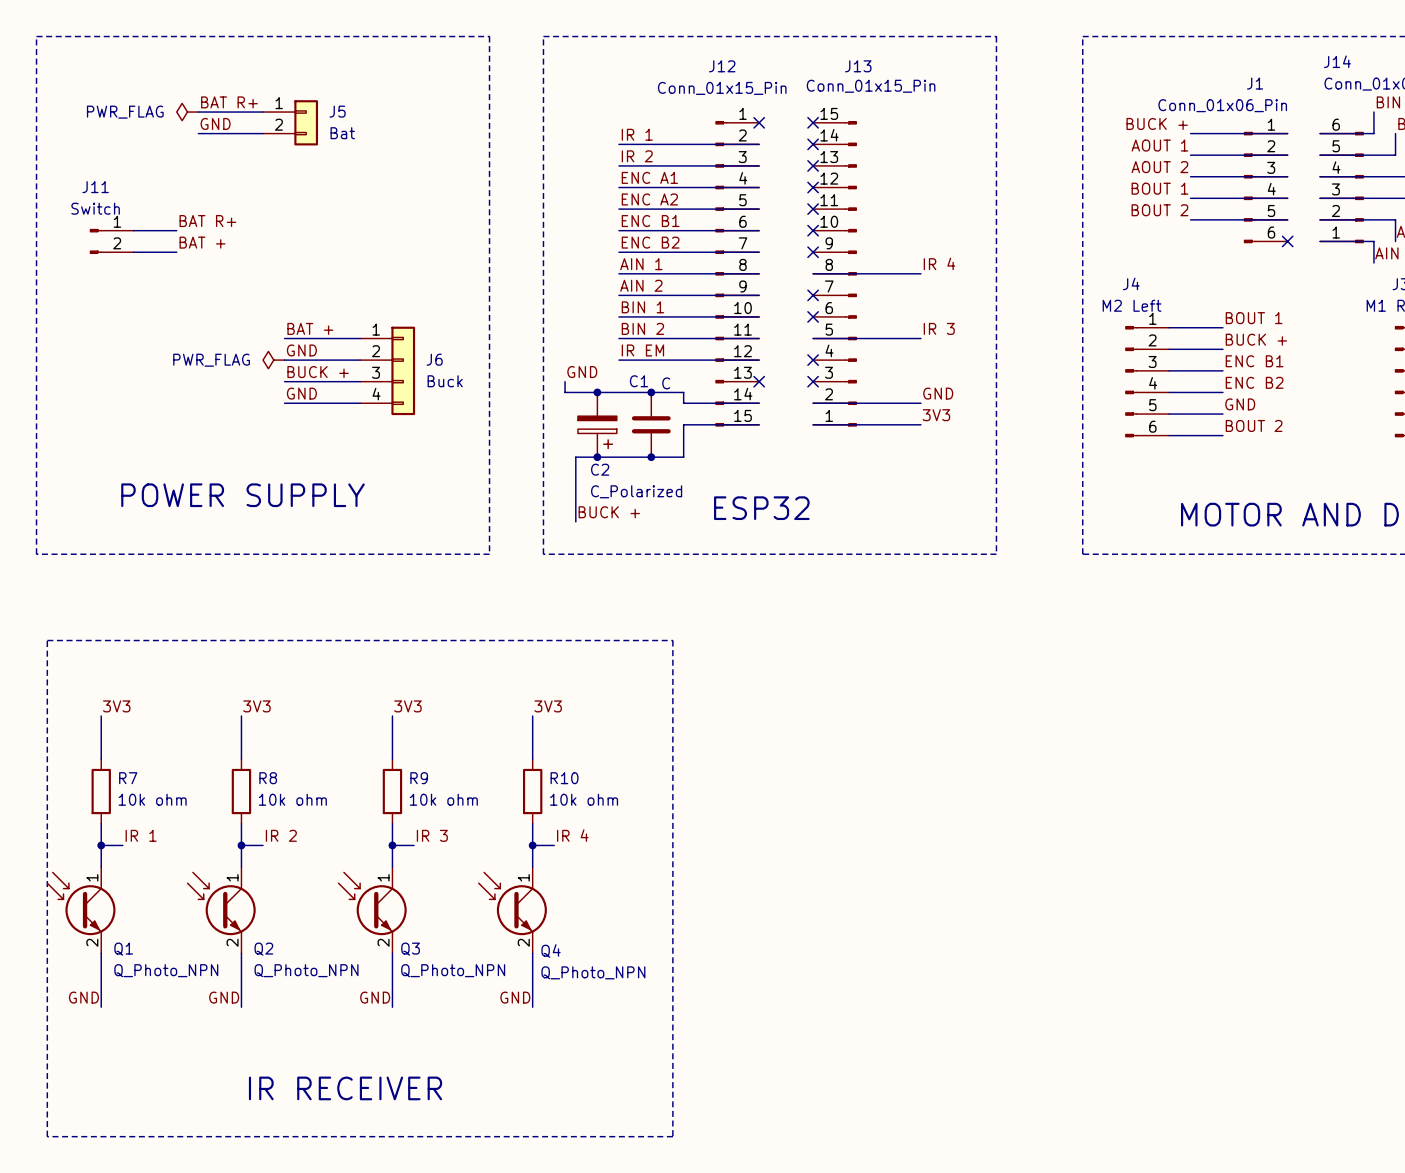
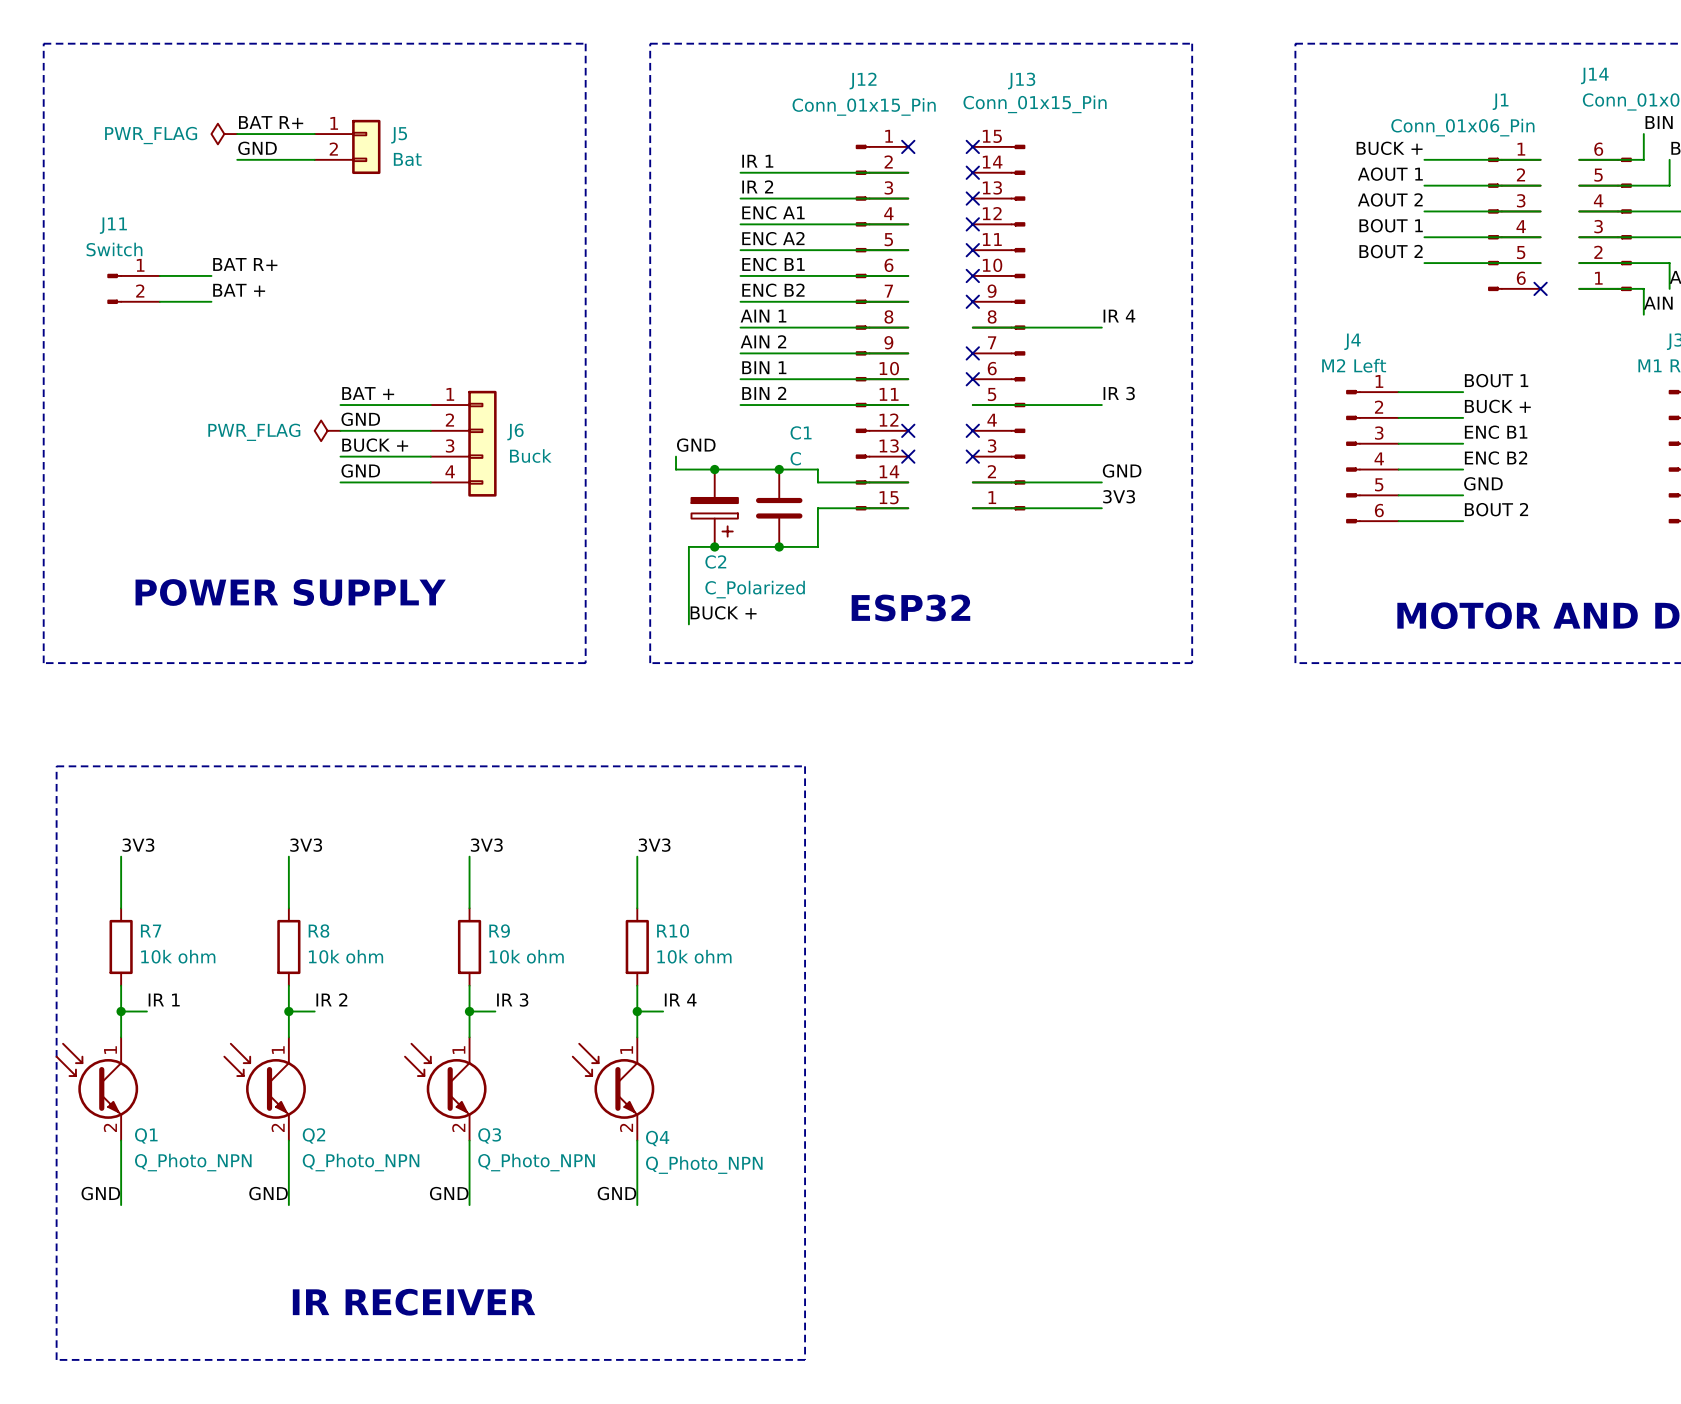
label: IR EM (642, 350) -> none
wire: (618, 360) (759, 360) -> none
no-connect mark: none -> (908, 430)
C1 name position: C1 (638, 381) -> C1 (801, 432)

